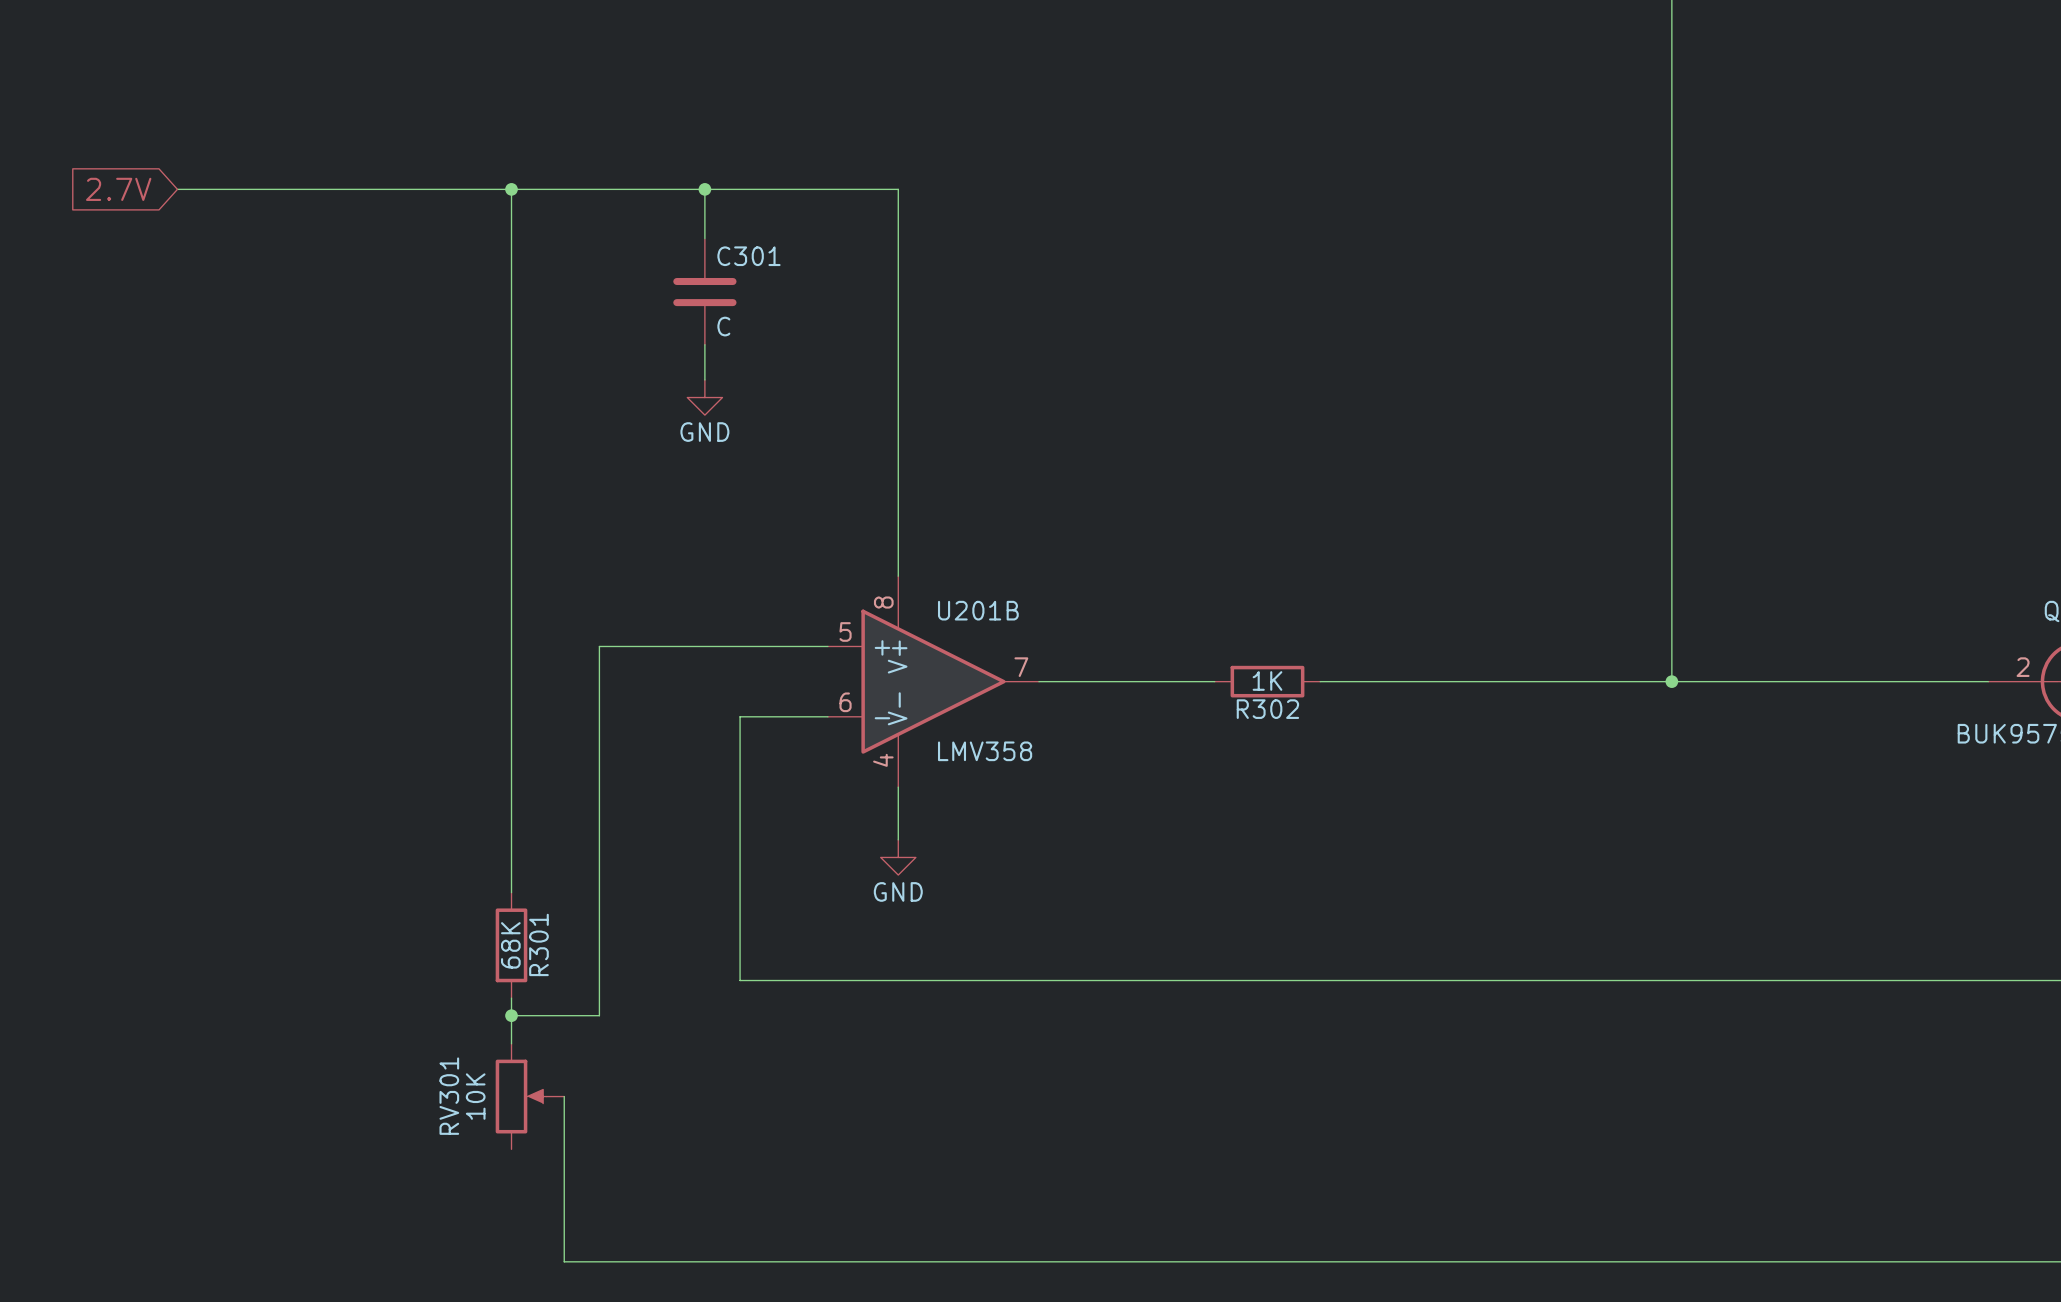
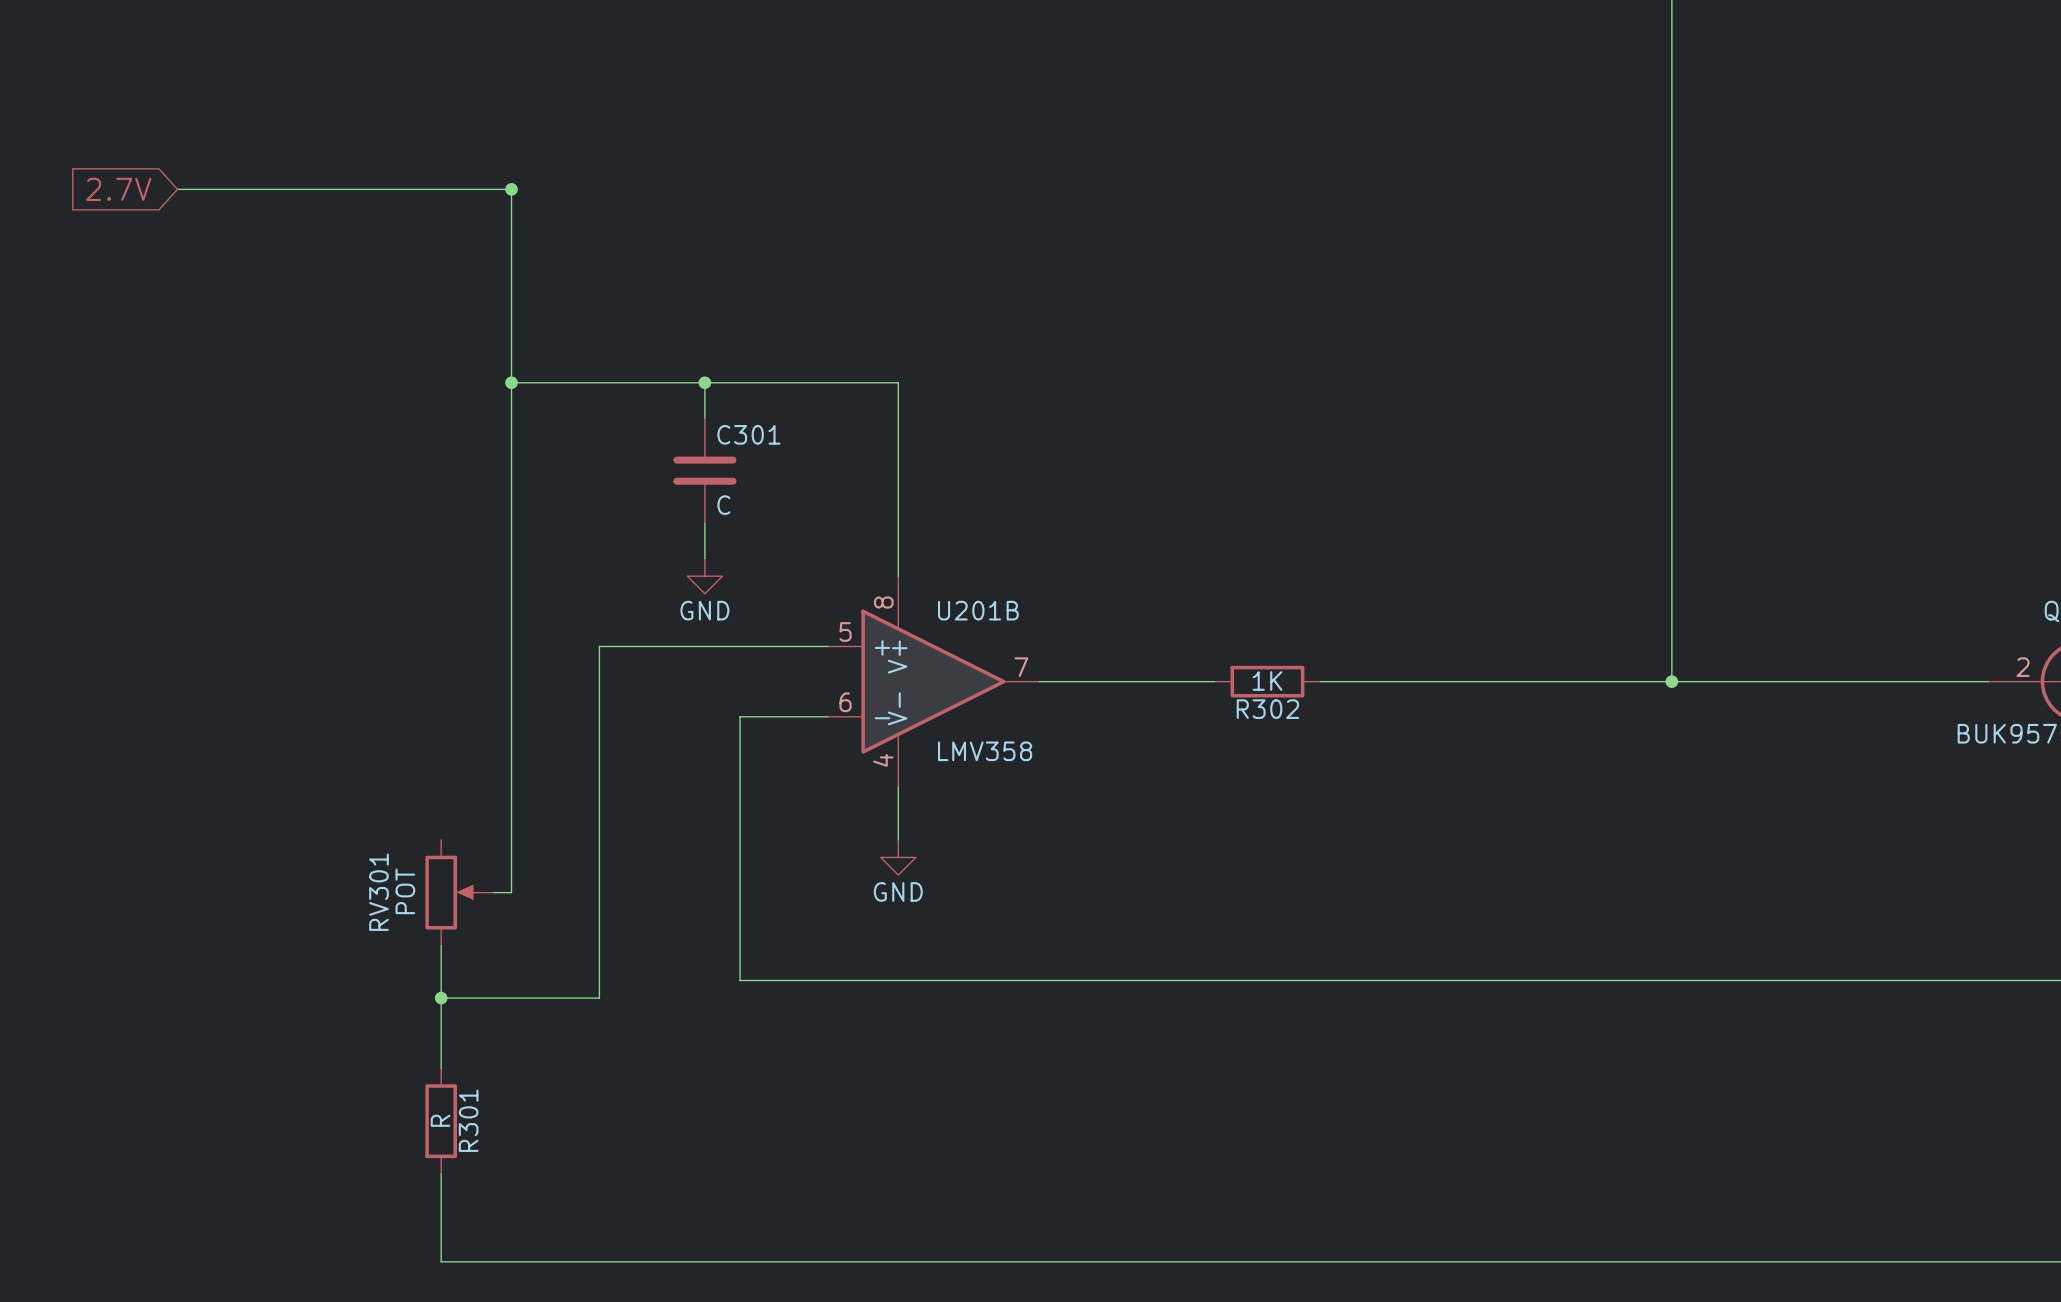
wire: (511, 189) (898, 189) (898, 382) -> (511, 382) (898, 382)
wire: (704, 189) (704, 238) -> none
junction: (704, 189) -> none
C301 position: (704, 292) -> (704, 470)
wire: (704, 344) (704, 379) -> (704, 382) (704, 417)
junction: none -> (511, 382)
junction: none -> (704, 382)
power symbol position: GND (704, 397) -> GND (704, 576)
wire: none -> (704, 523) (704, 558)
wire: none -> (493, 892) (511, 892)
wire: none -> (441, 945) (441, 1068)
R301 value: 68K (510, 945) -> R (440, 1120)
R301 position: (511, 945) -> (441, 1121)
wire: (511, 998) (511, 1043) -> none
wire: (599, 998) (599, 1015) (511, 1015) -> (599, 998) (441, 998)
junction position: (511, 1015) -> (441, 998)
RV301 value: 10K (475, 1096) -> POT (405, 891)
RV301 position: (529, 1096) -> (459, 892)
wire: (564, 1096) (564, 1261) -> (441, 1173) (441, 1261) (564, 1261)

